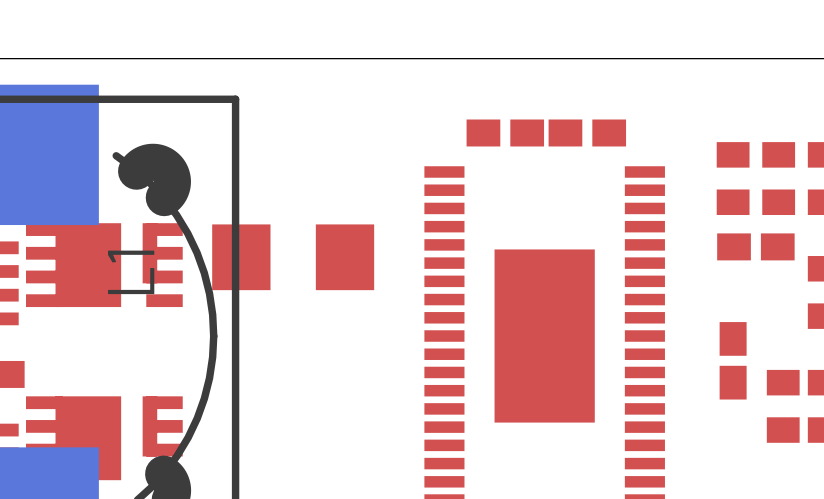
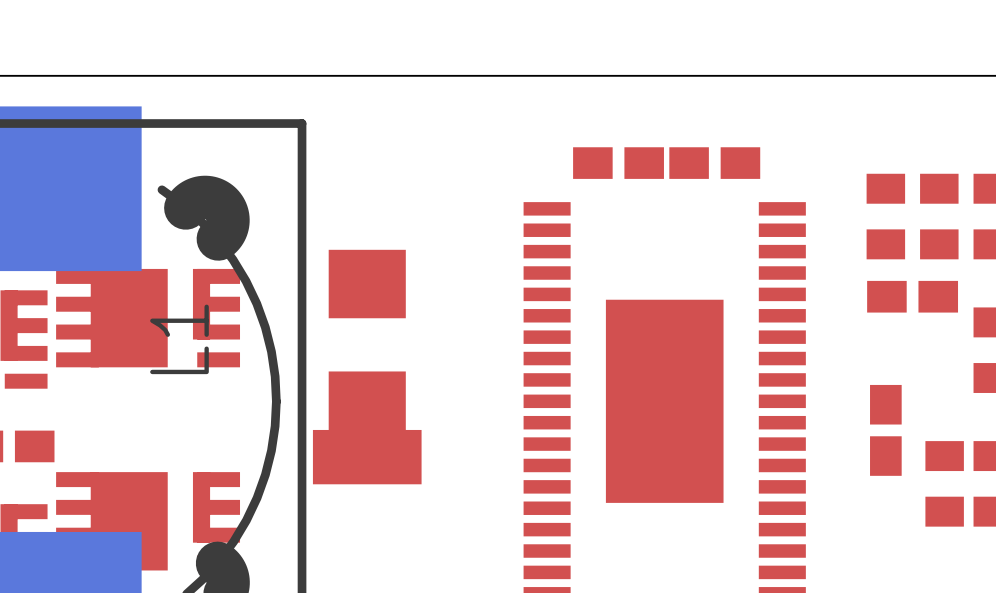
part rotation: 0° (293, 257) -> 90° clockwise (367, 344)
part: none -> (367, 457)

